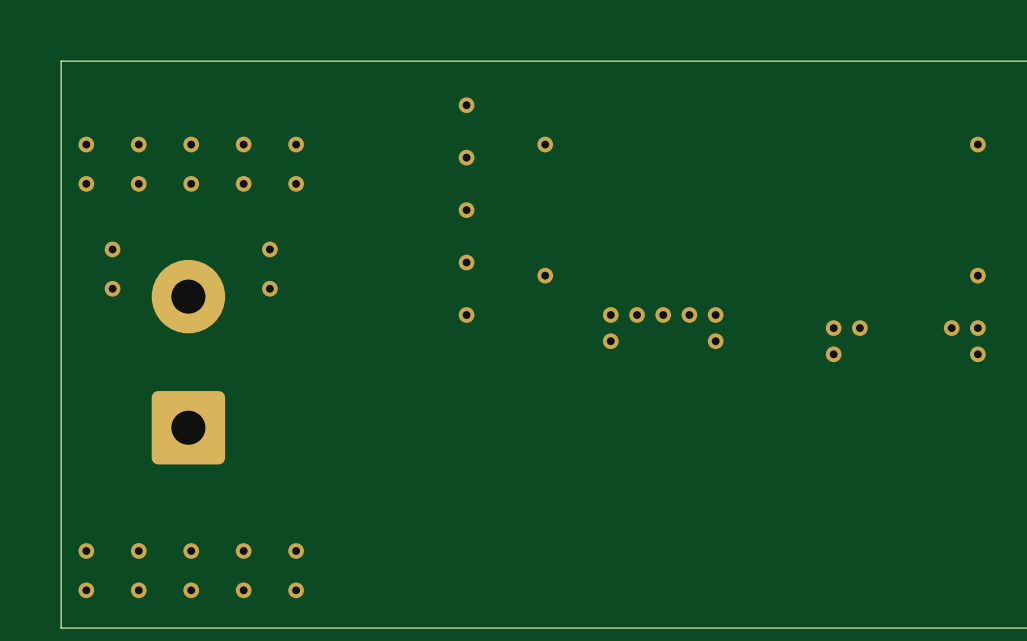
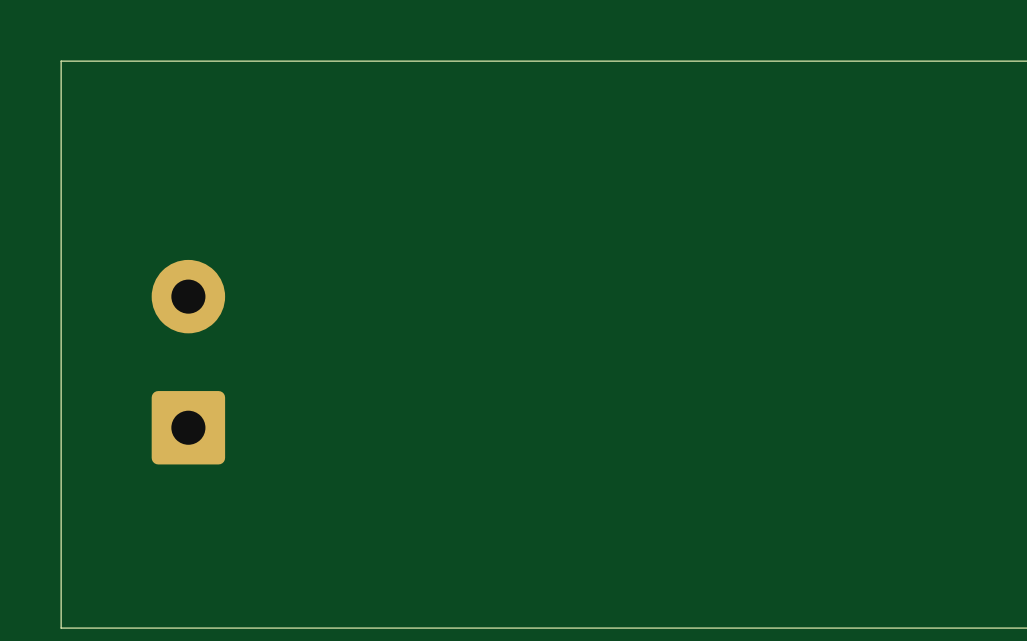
via: (466, 105) -> none
via: (86, 144) -> none
via: (138, 144) -> none
via: (191, 144) -> none
via: (243, 144) -> none
via: (296, 144) -> none
via: (545, 144) -> none
via: (977, 144) -> none
via: (466, 157) -> none
via: (86, 183) -> none
via: (138, 183) -> none
via: (191, 183) -> none
via: (243, 183) -> none
via: (296, 183) -> none
via: (466, 210) -> none
via: (112, 249) -> none
via: (269, 249) -> none
via: (466, 262) -> none
via: (545, 275) -> none
via: (977, 275) -> none
via: (112, 288) -> none
via: (269, 288) -> none
via: (466, 314) -> none
via: (610, 314) -> none
via: (637, 314) -> none
via: (663, 314) -> none
via: (689, 314) -> none
via: (715, 314) -> none
via: (833, 328) -> none
via: (859, 328) -> none
via: (951, 328) -> none
via: (977, 328) -> none
via: (610, 341) -> none
via: (715, 341) -> none
via: (833, 354) -> none
via: (977, 354) -> none
via: (86, 550) -> none
via: (138, 550) -> none
via: (191, 550) -> none
via: (243, 550) -> none
via: (296, 550) -> none
via: (86, 590) -> none
via: (138, 590) -> none
via: (191, 590) -> none
via: (243, 590) -> none
via: (296, 590) -> none

